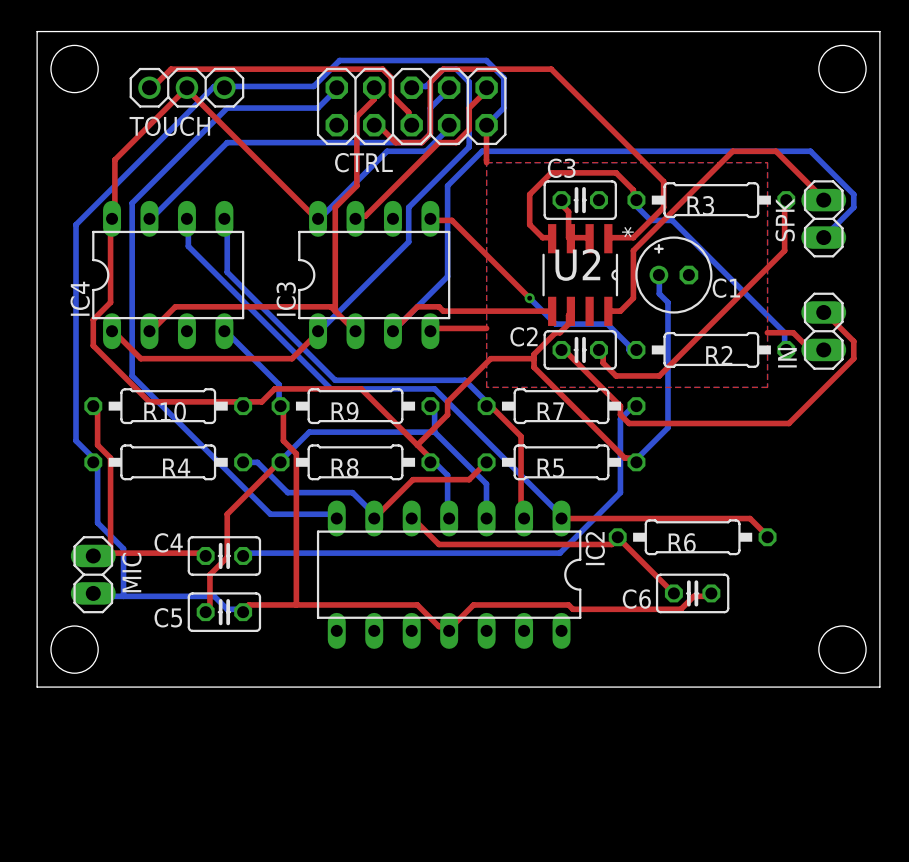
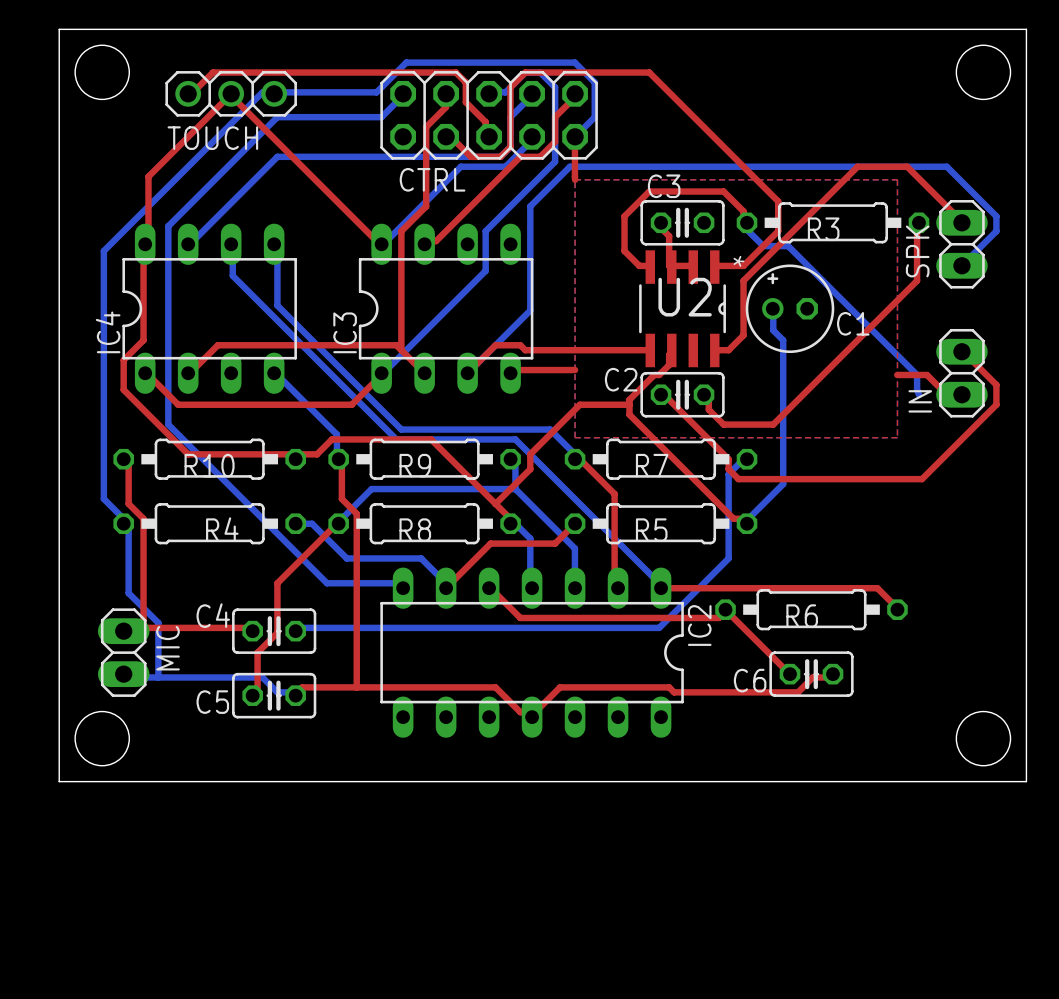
top track: (430, 218) (451, 220) (529, 298) -> none
bottom track: (529, 298) (555, 324) (607, 324) (629, 345) (629, 350) (633, 354) (636, 349) -> none
via: (529, 298) -> none
R2: (711, 349) -> none

